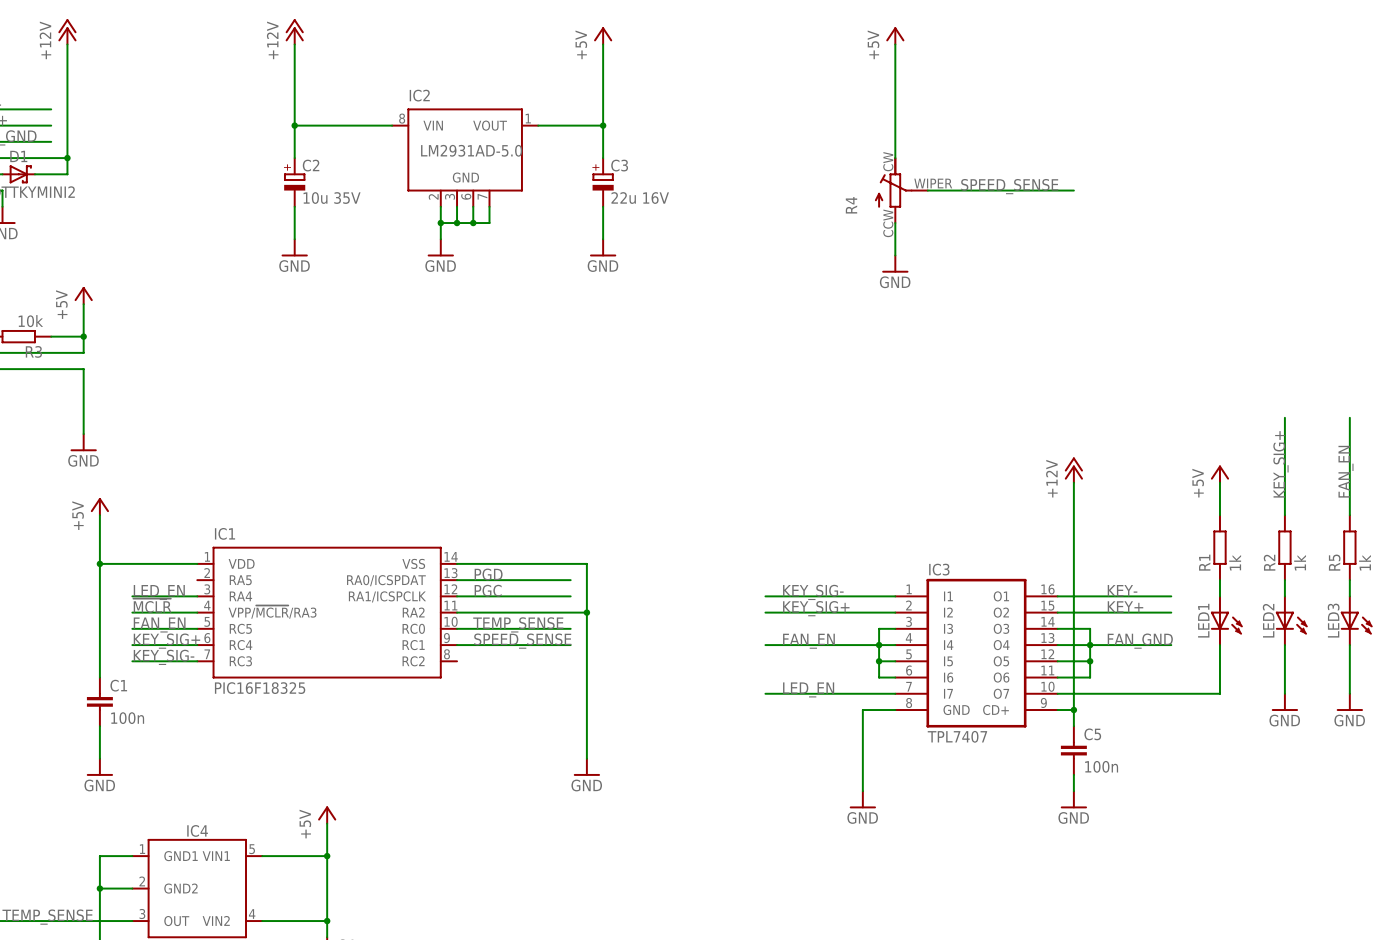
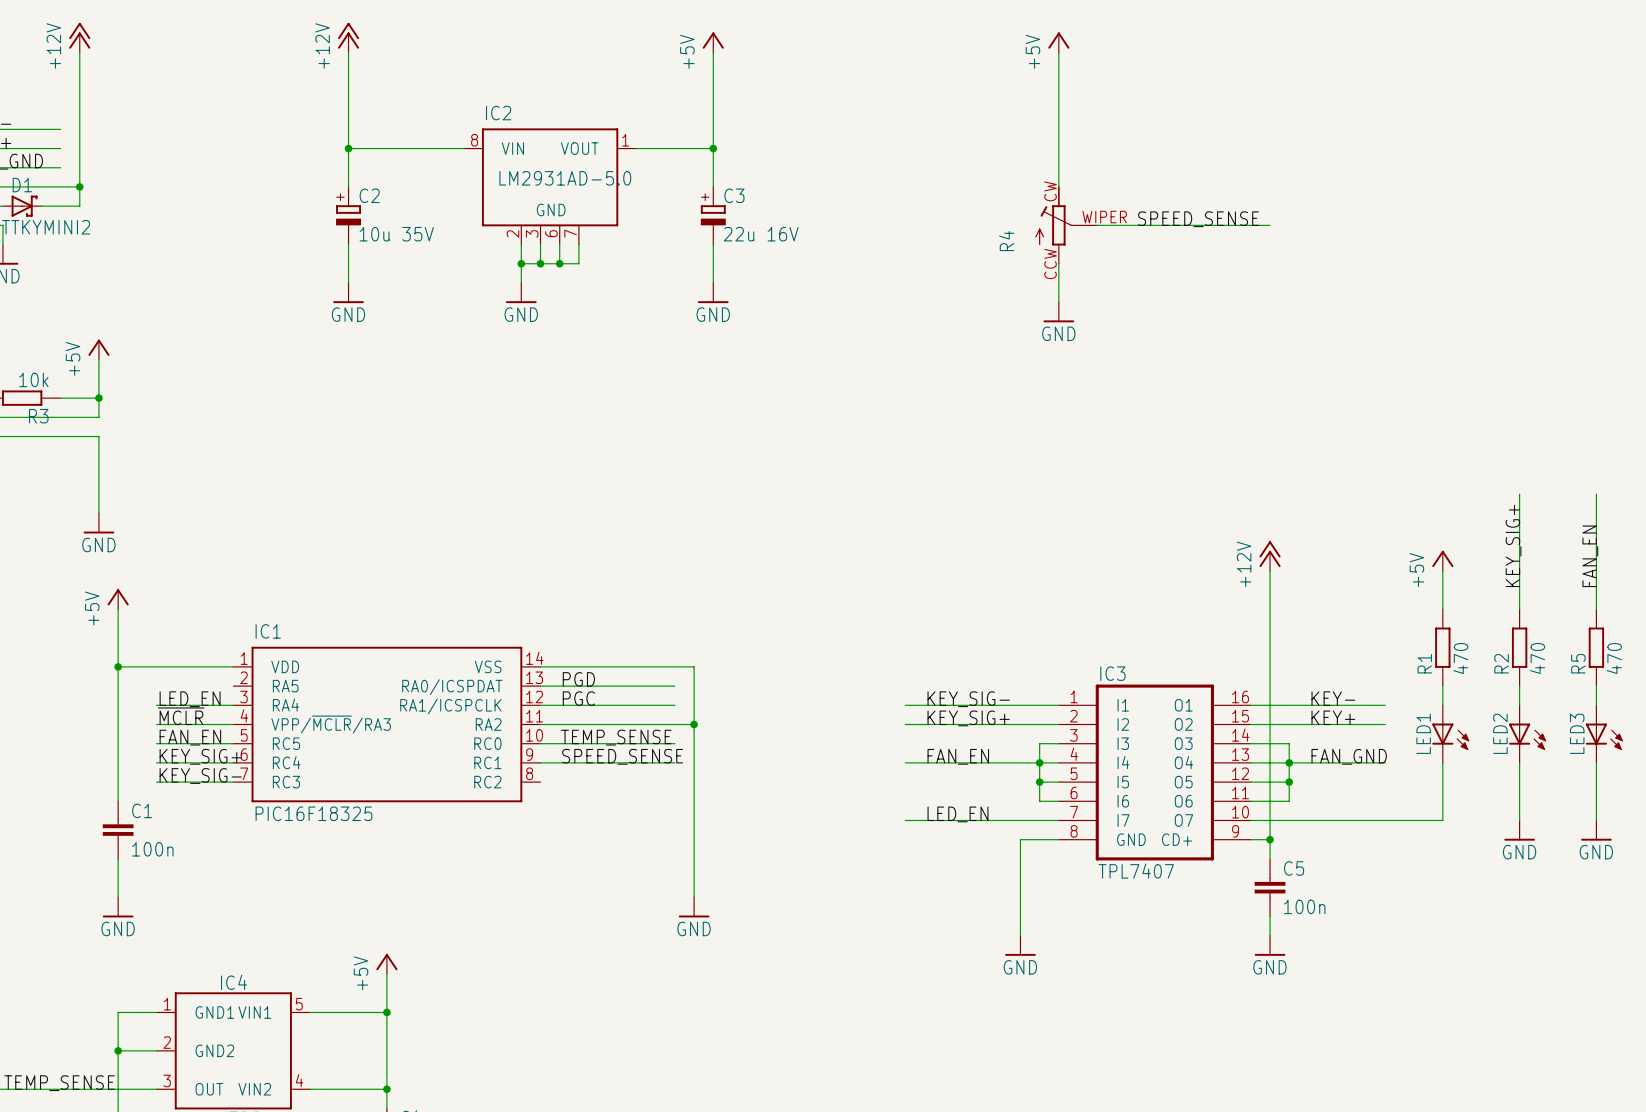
R1 value: 1k (1235, 562) -> 470 (1460, 658)
R2 value: 1k (1300, 562) -> 470 (1537, 658)
R5 value: 1k (1365, 562) -> 470 (1614, 658)

